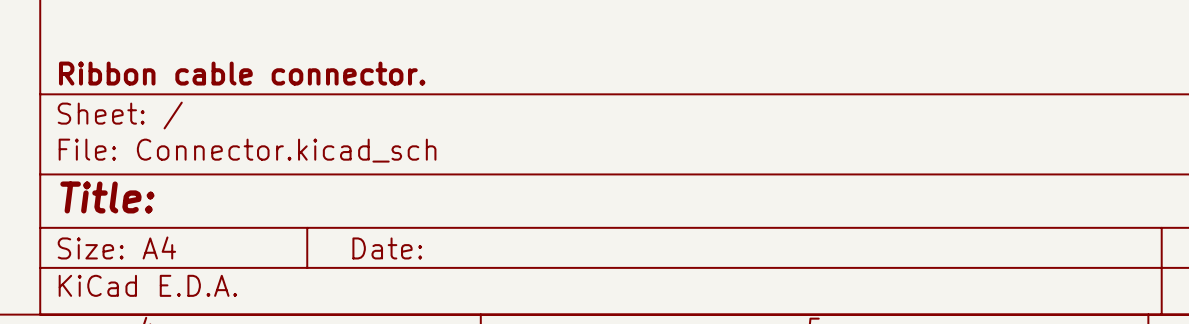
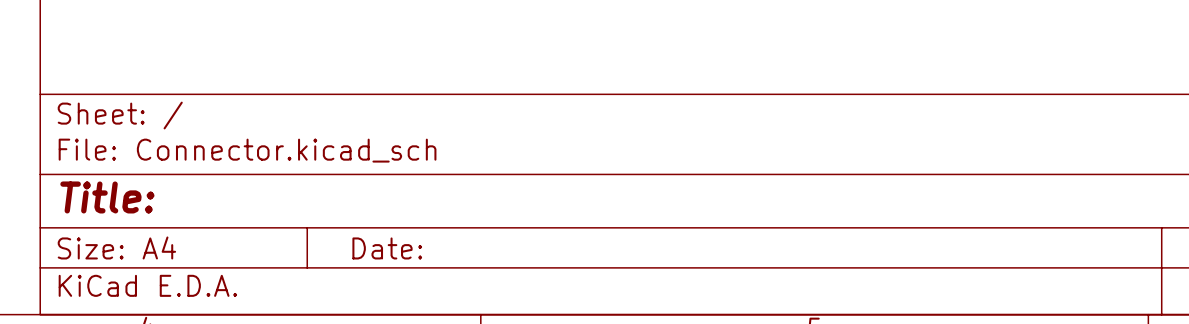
title block: Ribbon cable connector. (242, 73) -> none

